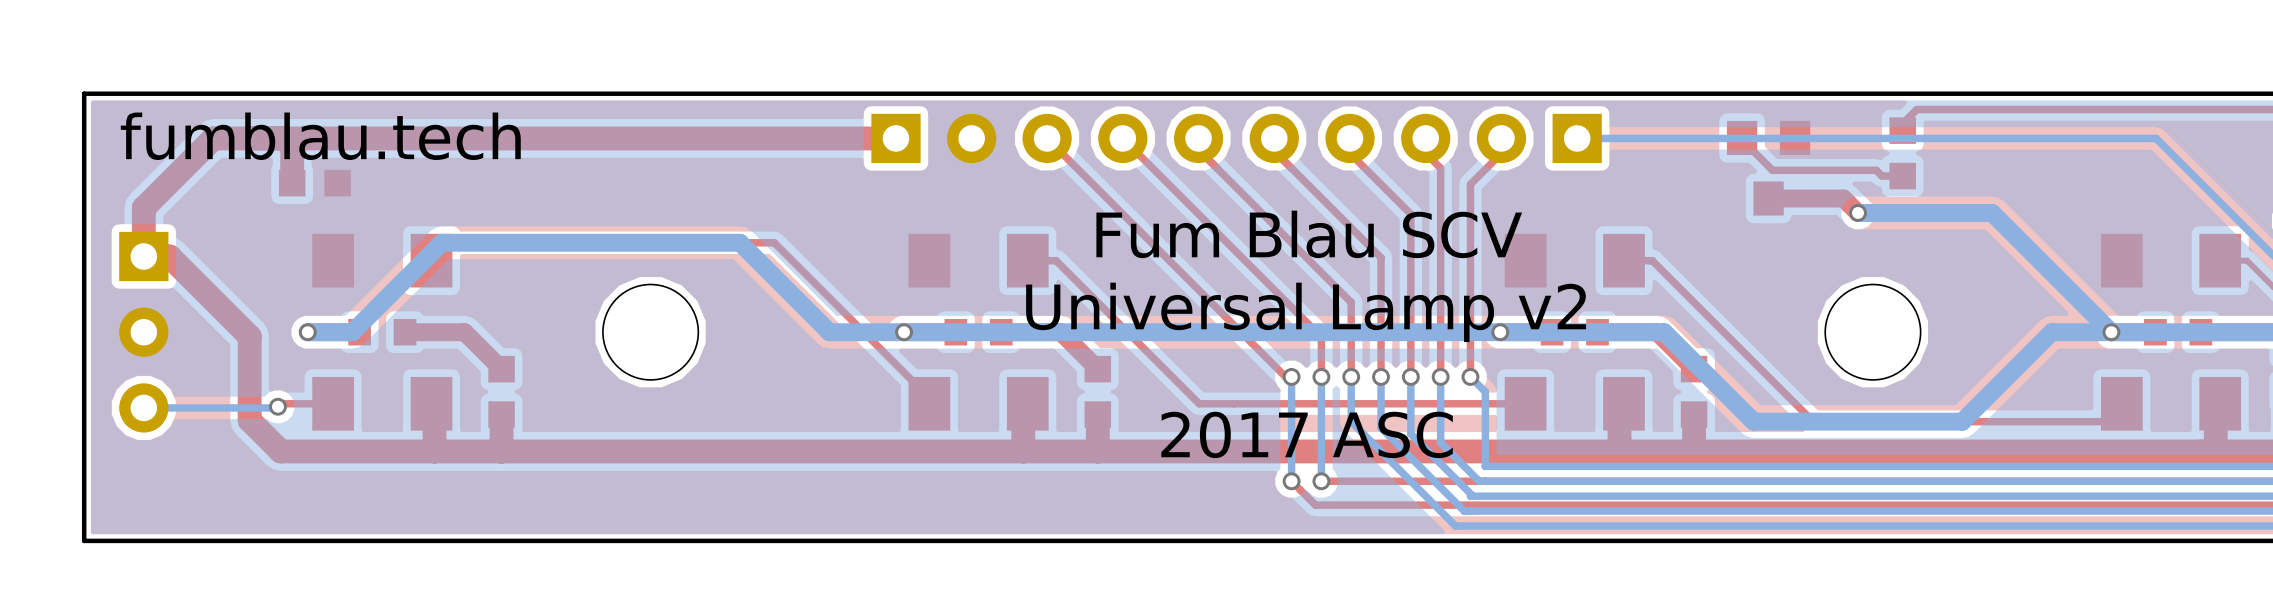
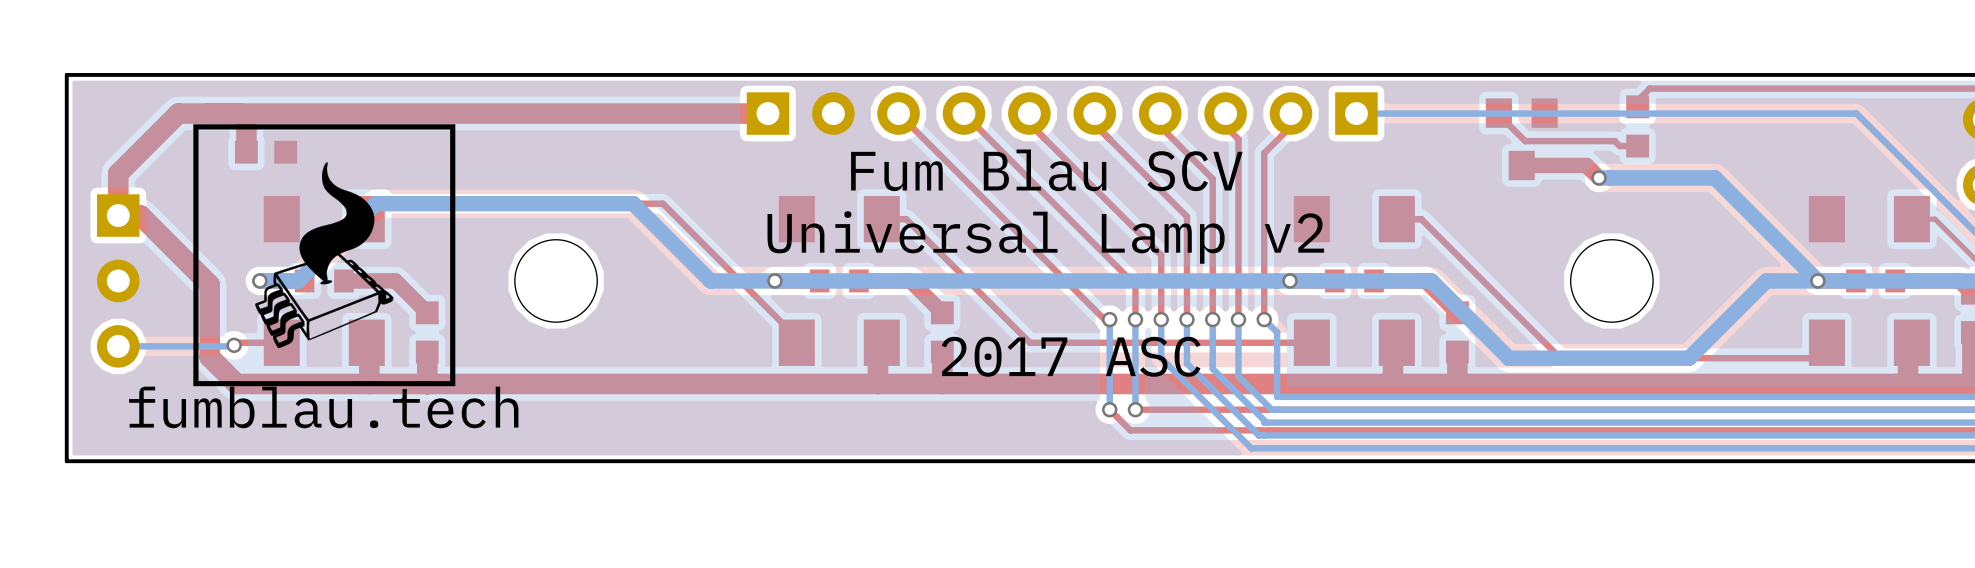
text position: fumblau.tech (320, 136) -> fumblau.tech (323, 407)
drawing: none -> [193, 124, 456, 387]
text position: Fum Blau SCV (1309, 234) -> Fum Blau SCV (1046, 170)
text position: Universal Lamp v2 (1306, 312) -> Universal Lamp v2 (1045, 237)
text position: 2017 ASC (1307, 434) -> 2017 ASC (1071, 356)

